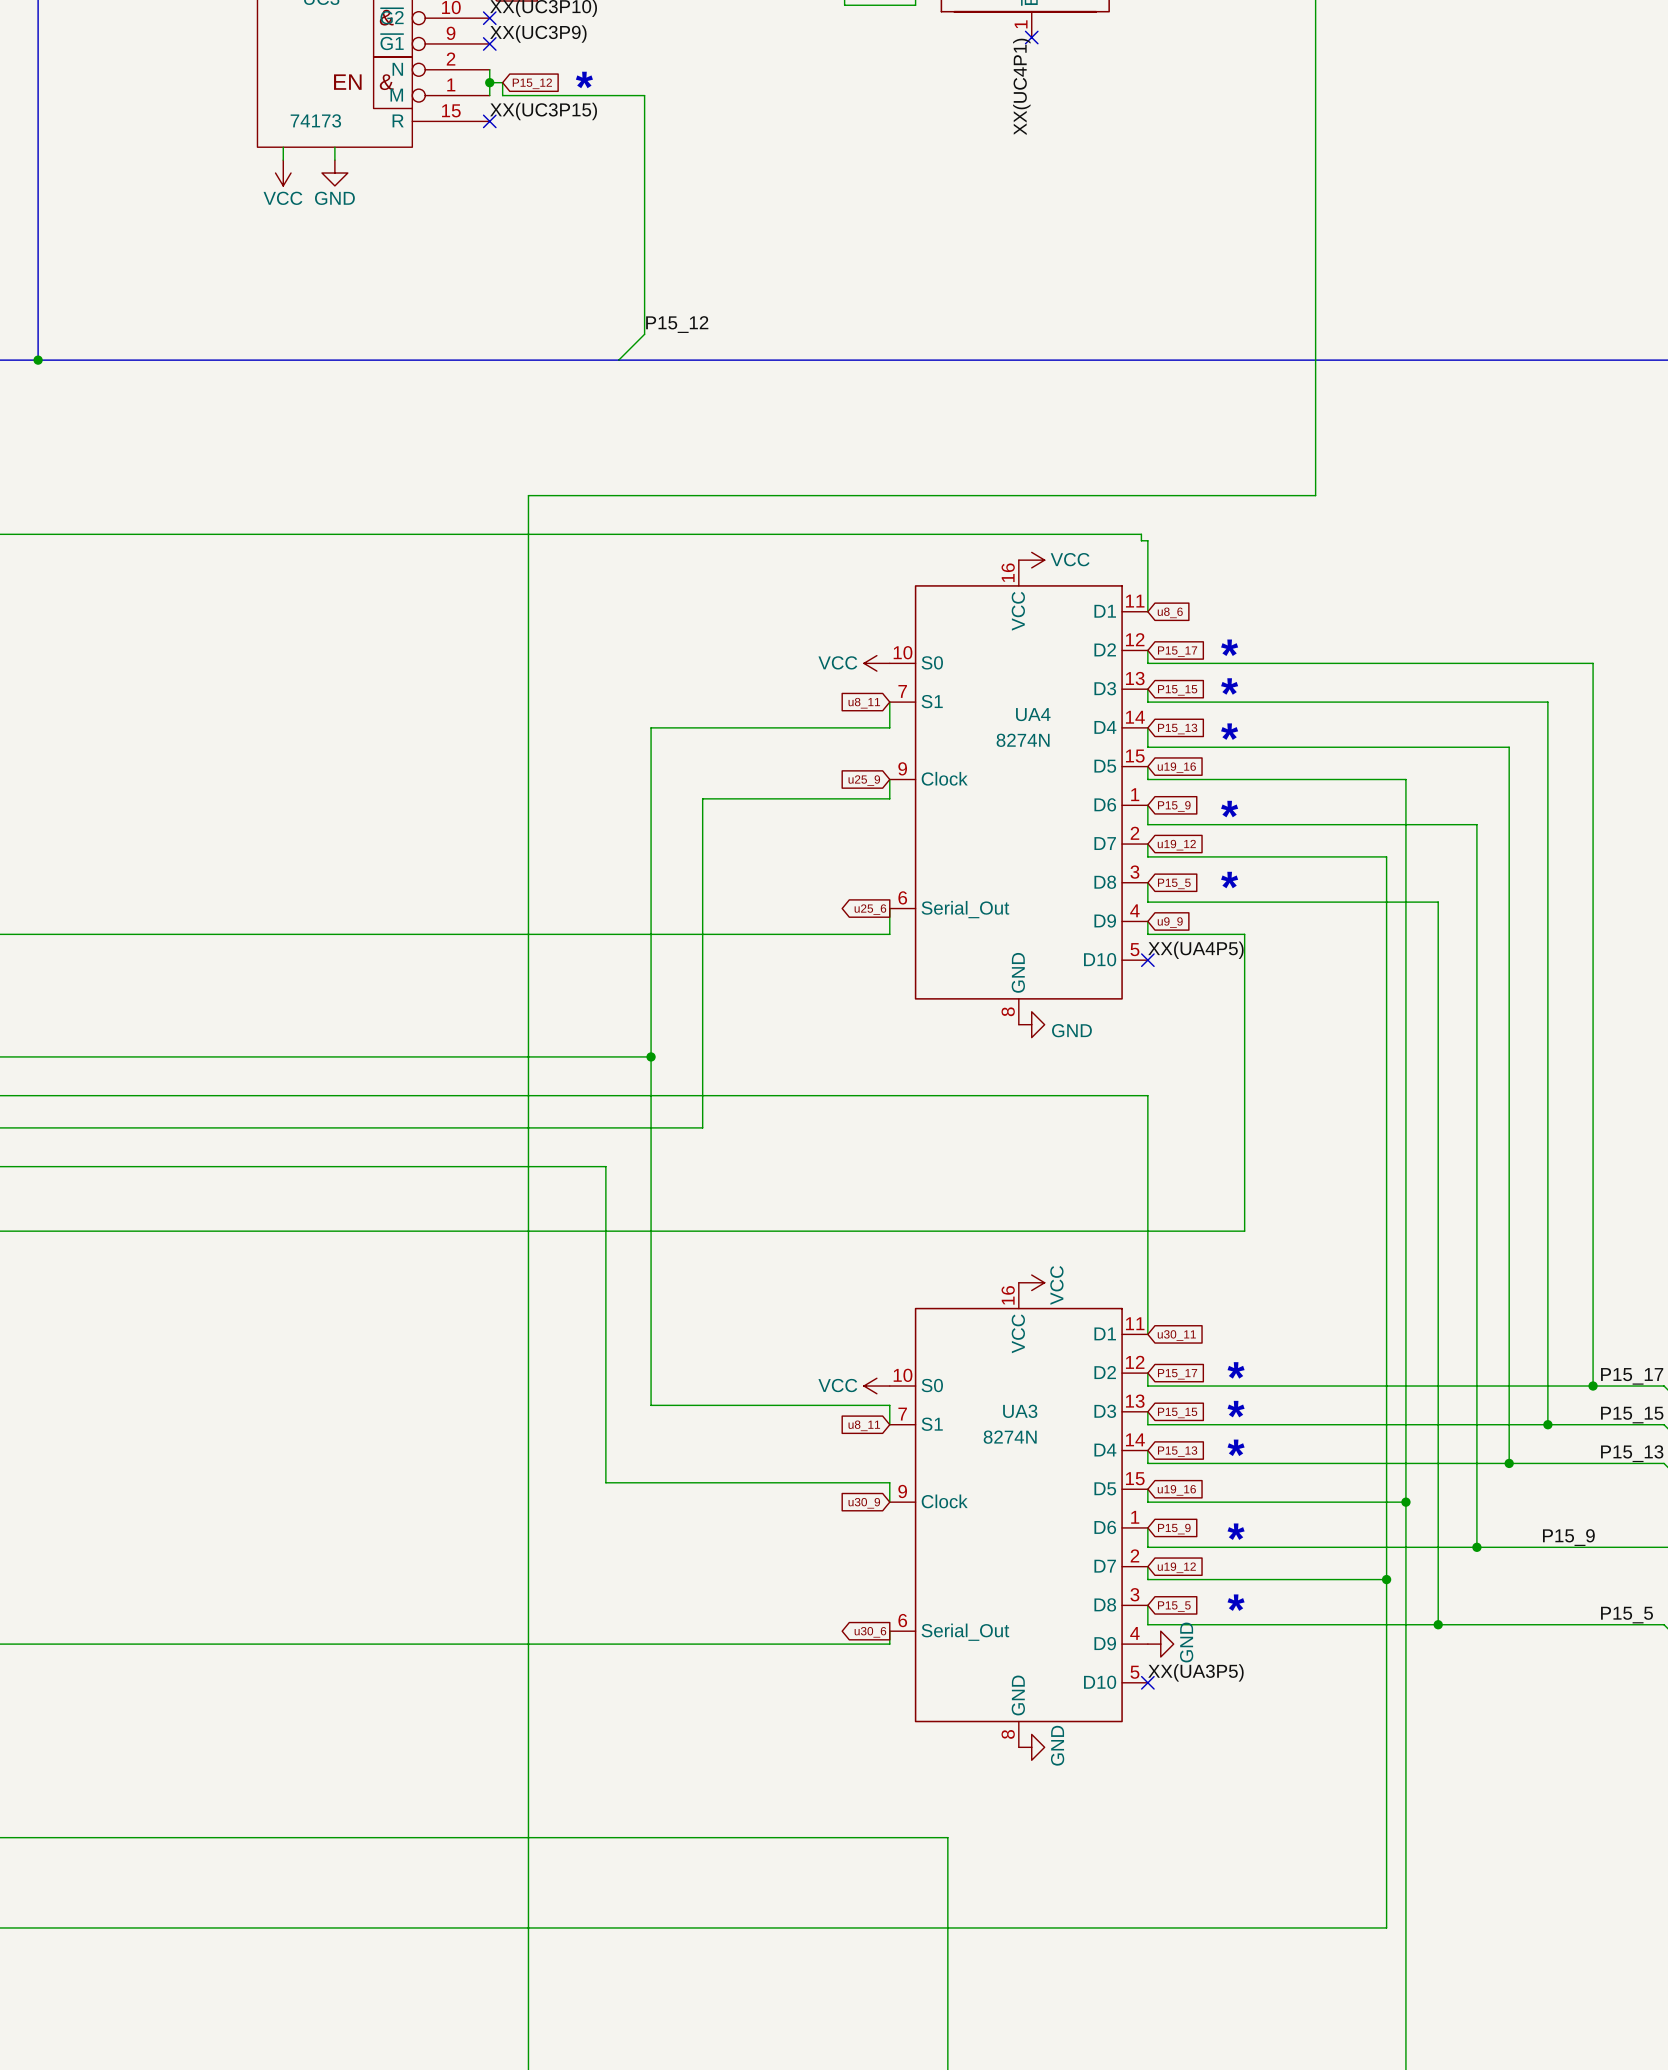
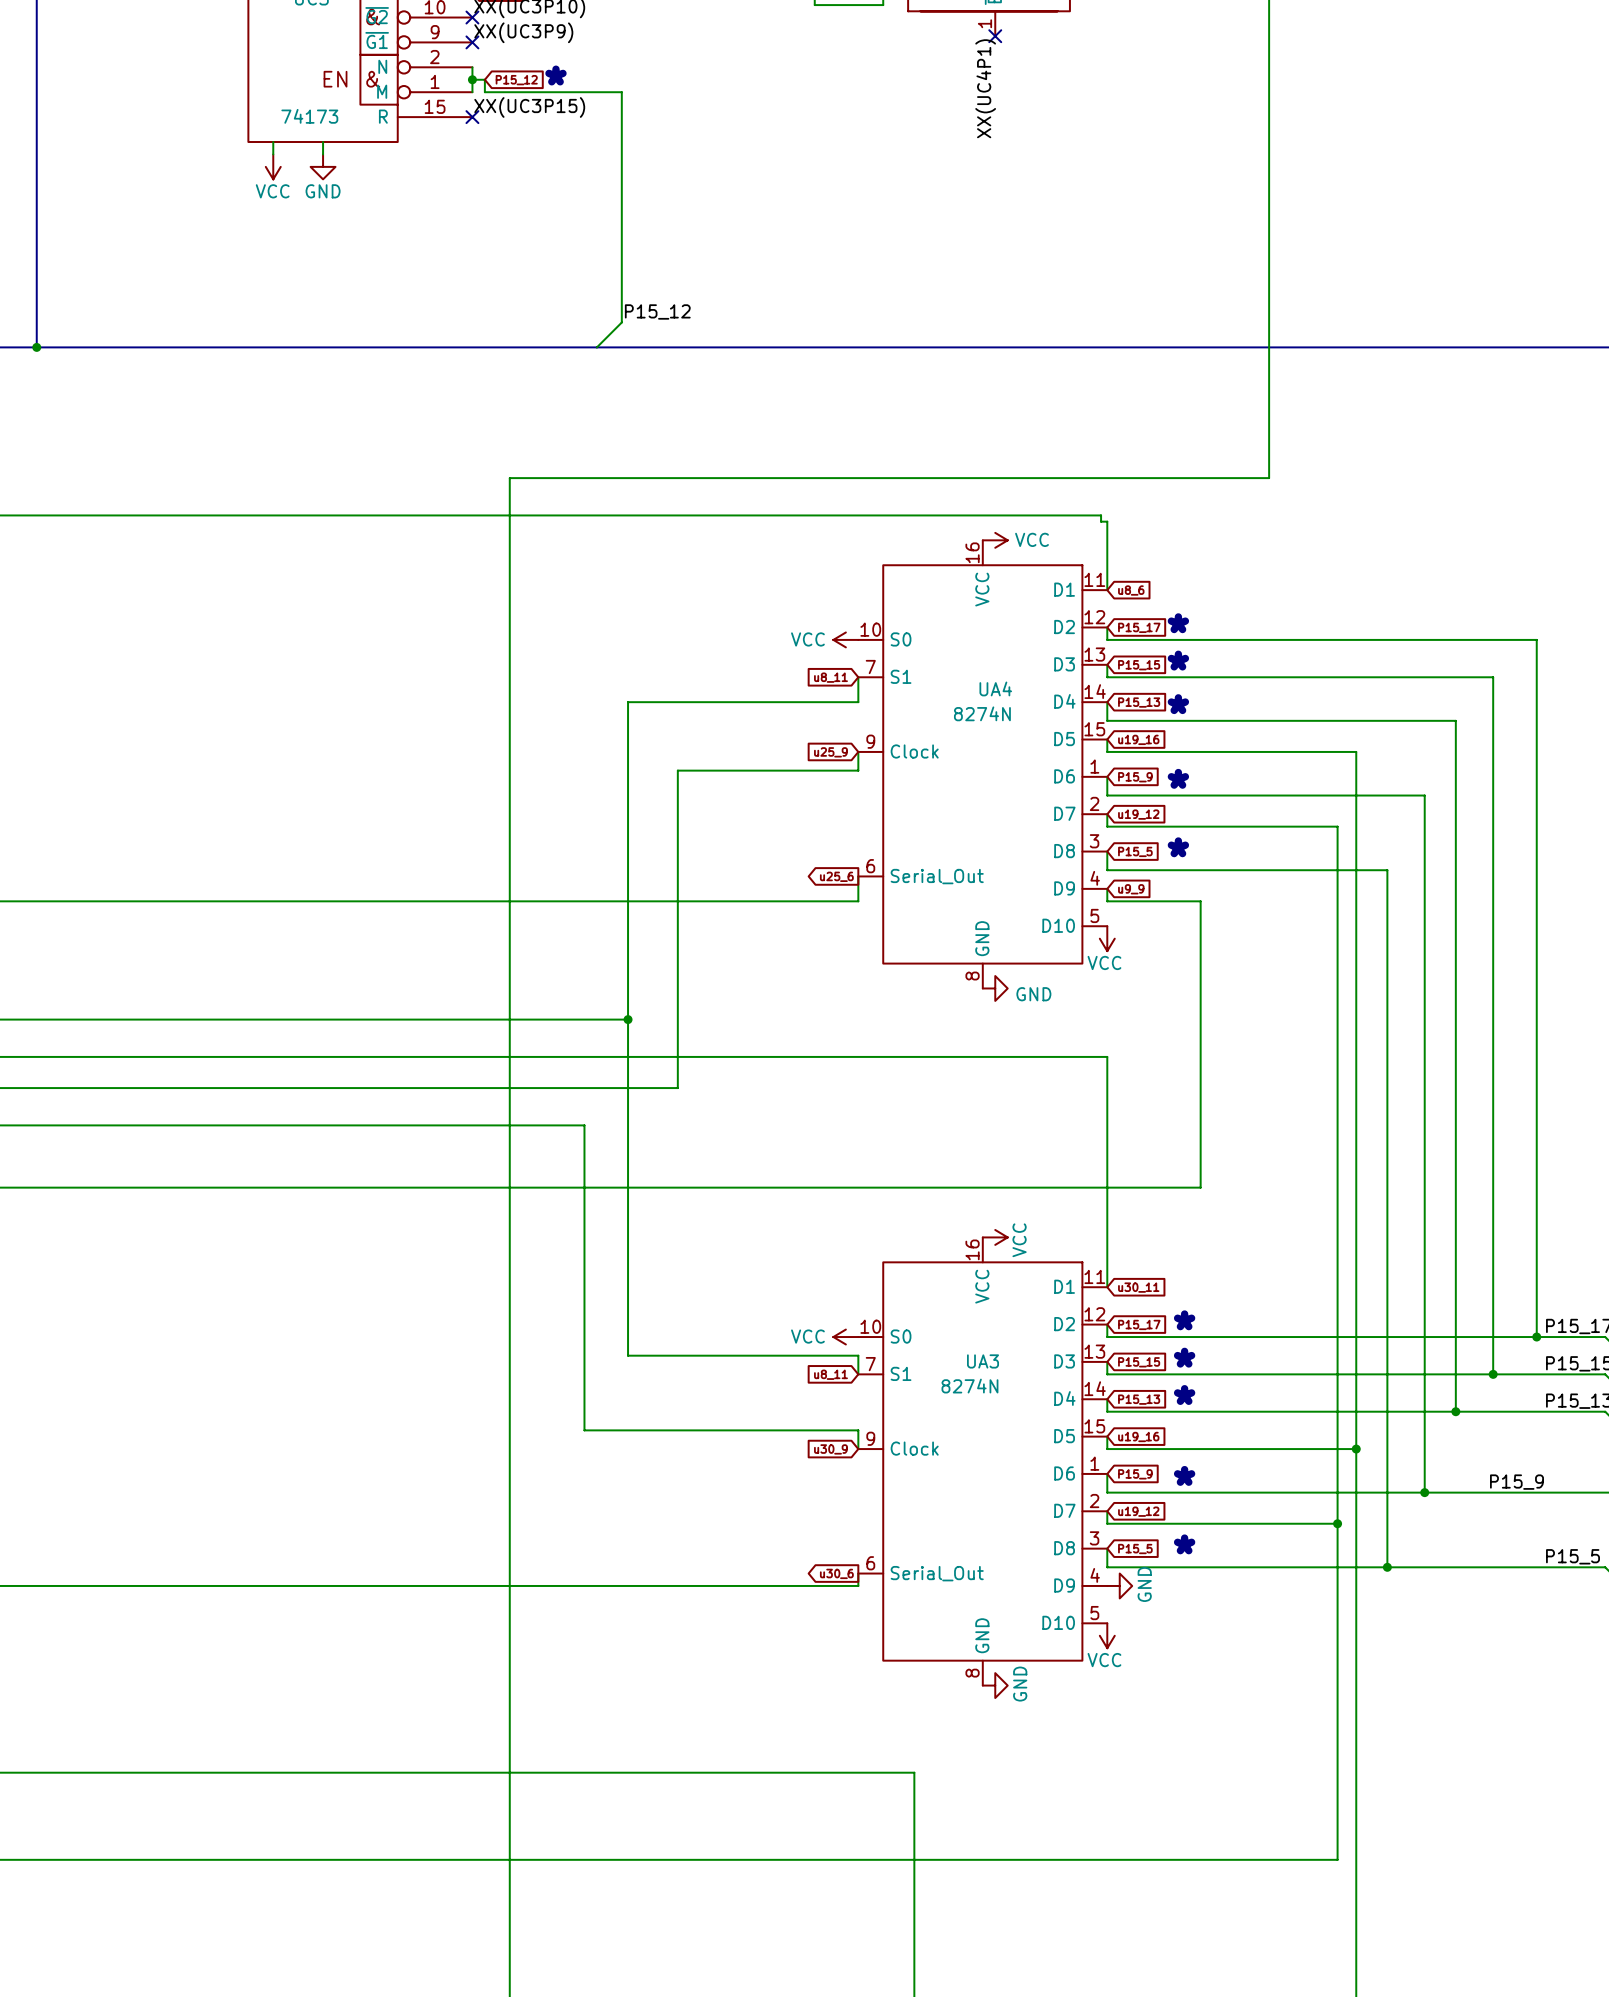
label: XX(UA4P5) (1195, 950) -> none
no-connect mark: (1147, 960) -> none
power symbol: none -> VCC (1107, 938)
label: XX(UA3P5) (1195, 1672) -> none
no-connect mark: (1147, 1682) -> none
power symbol: none -> VCC (1107, 1635)

